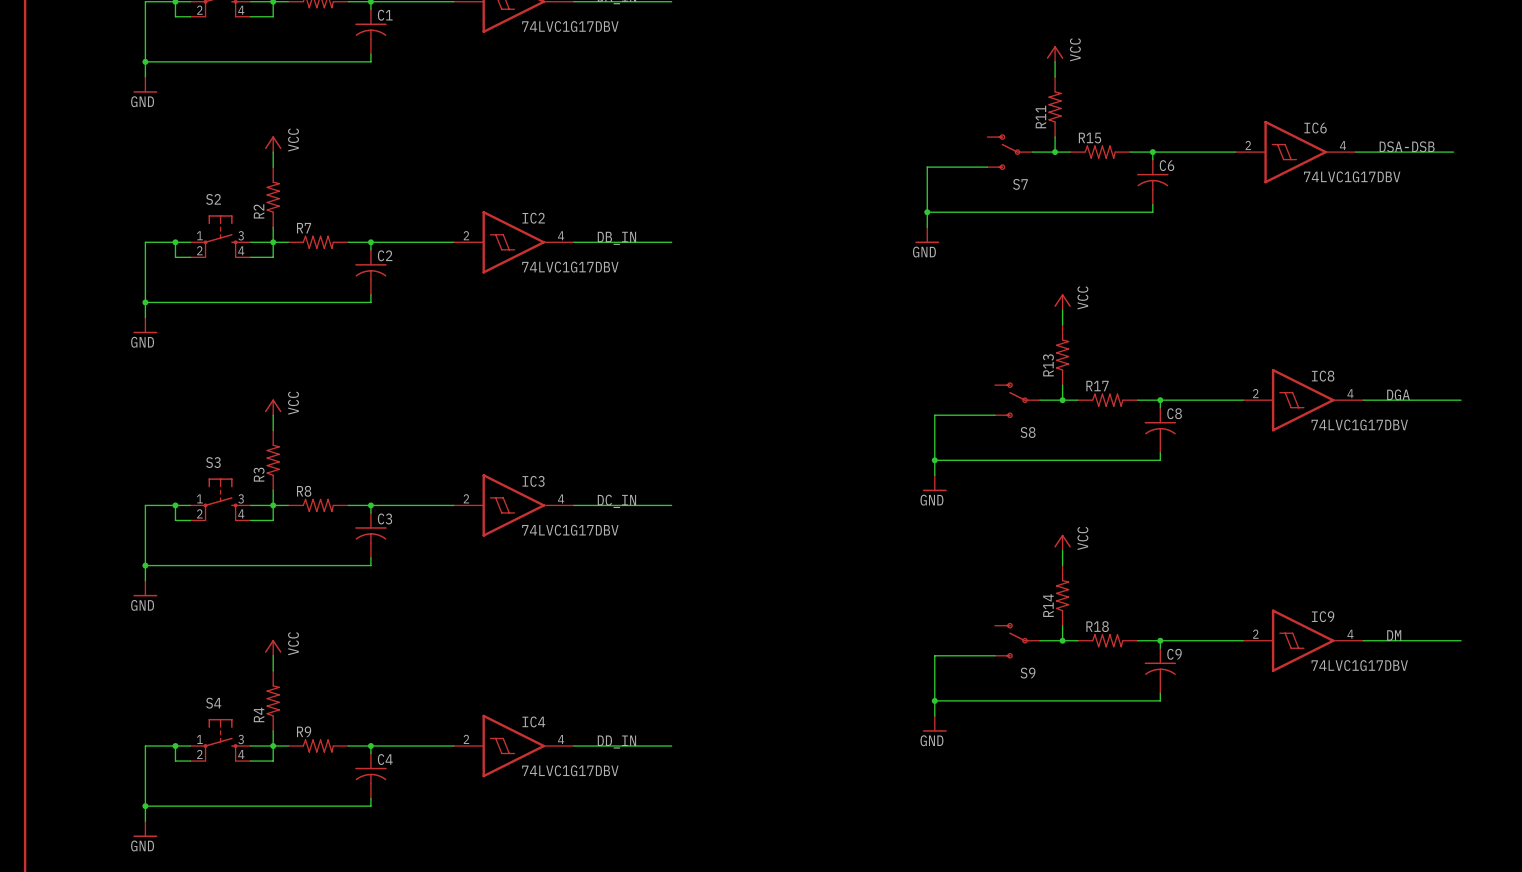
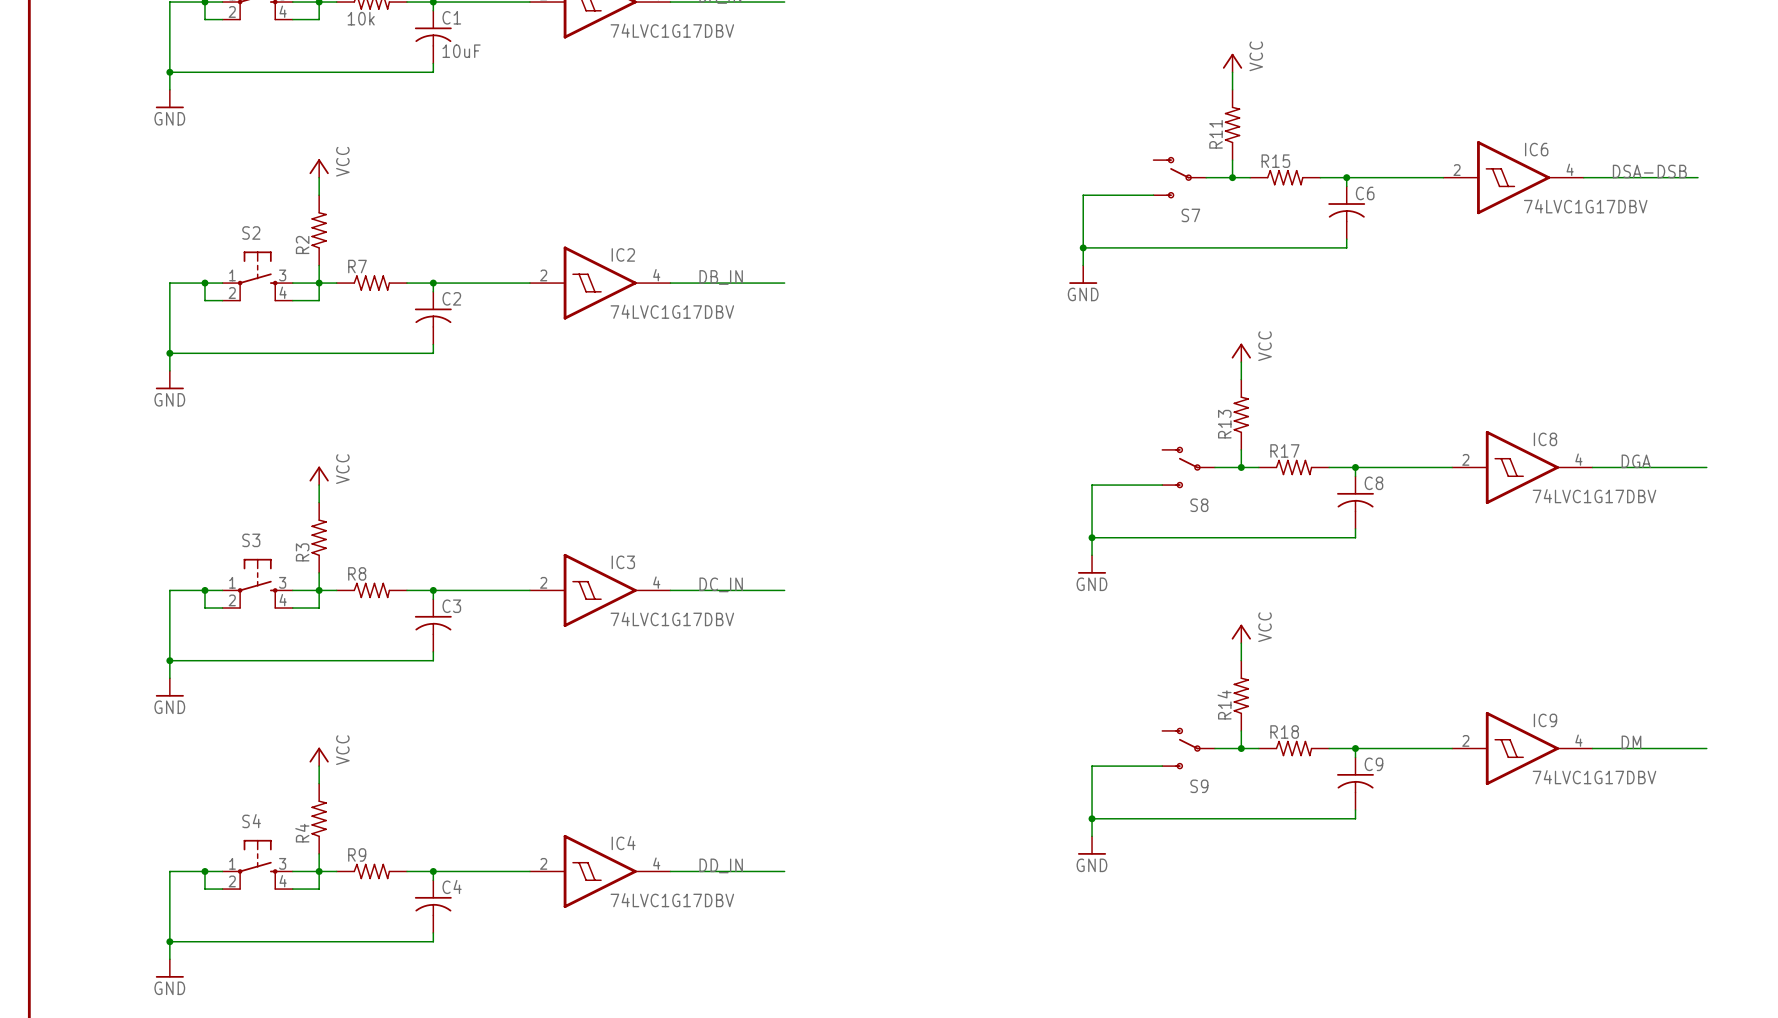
part value: none -> 10k (361, 18)
C1 value: none -> 10uF (461, 51)

